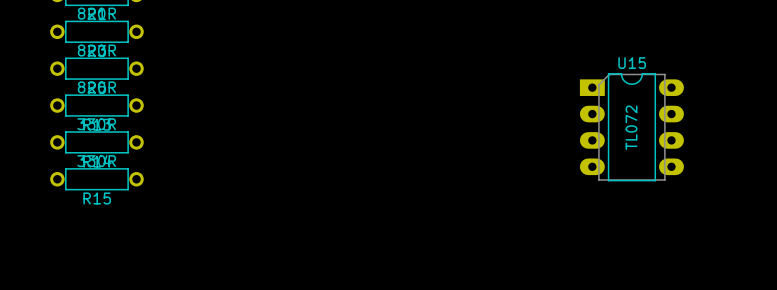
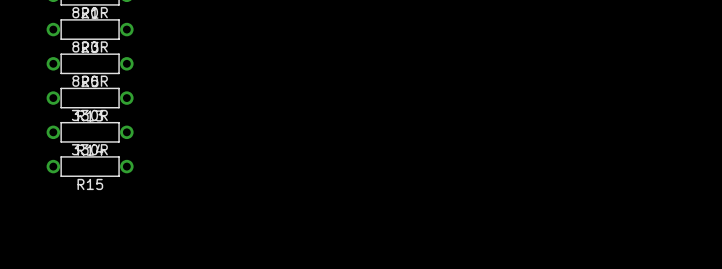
U15: TL072 (631, 127) -> none

